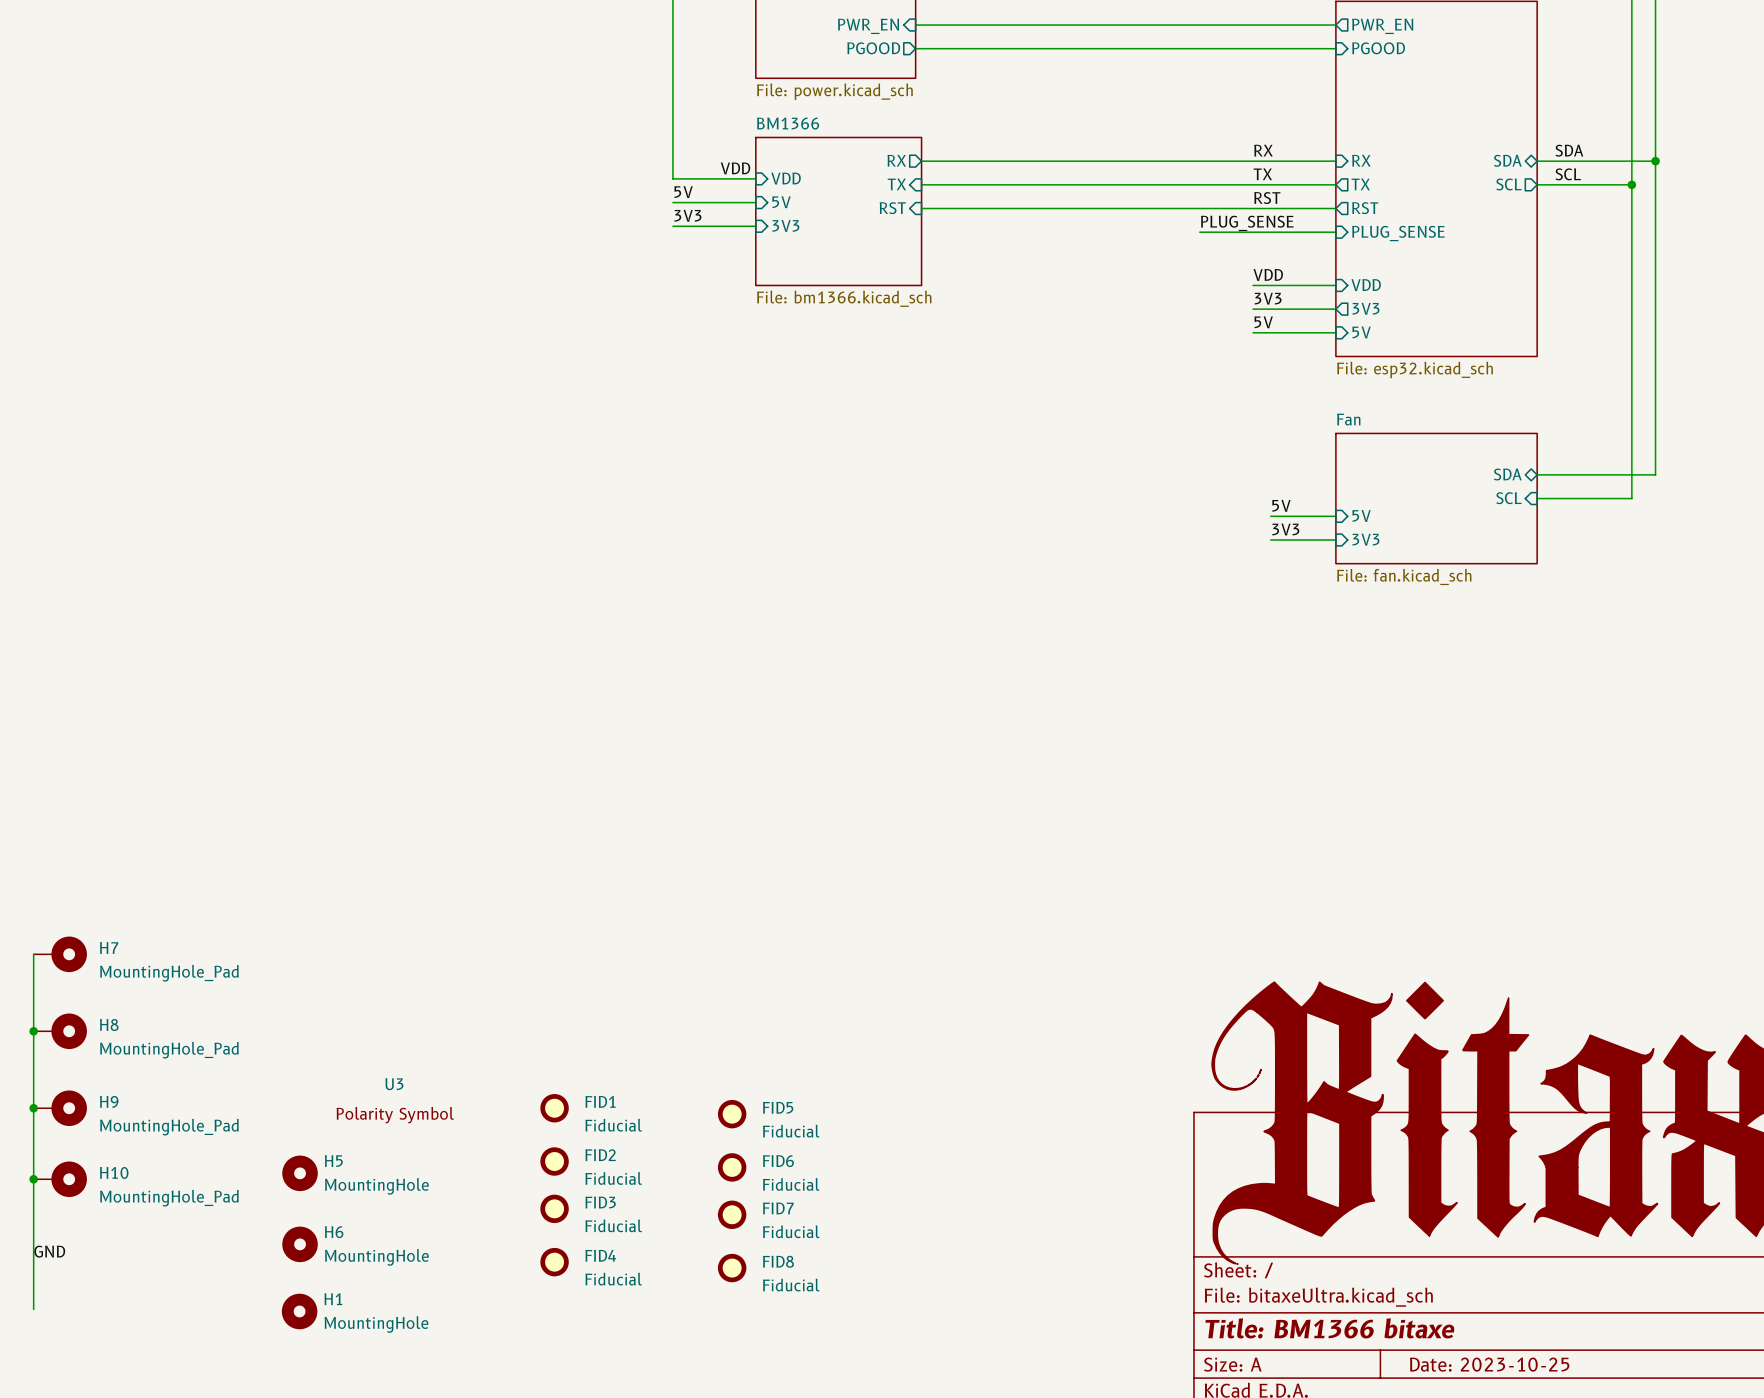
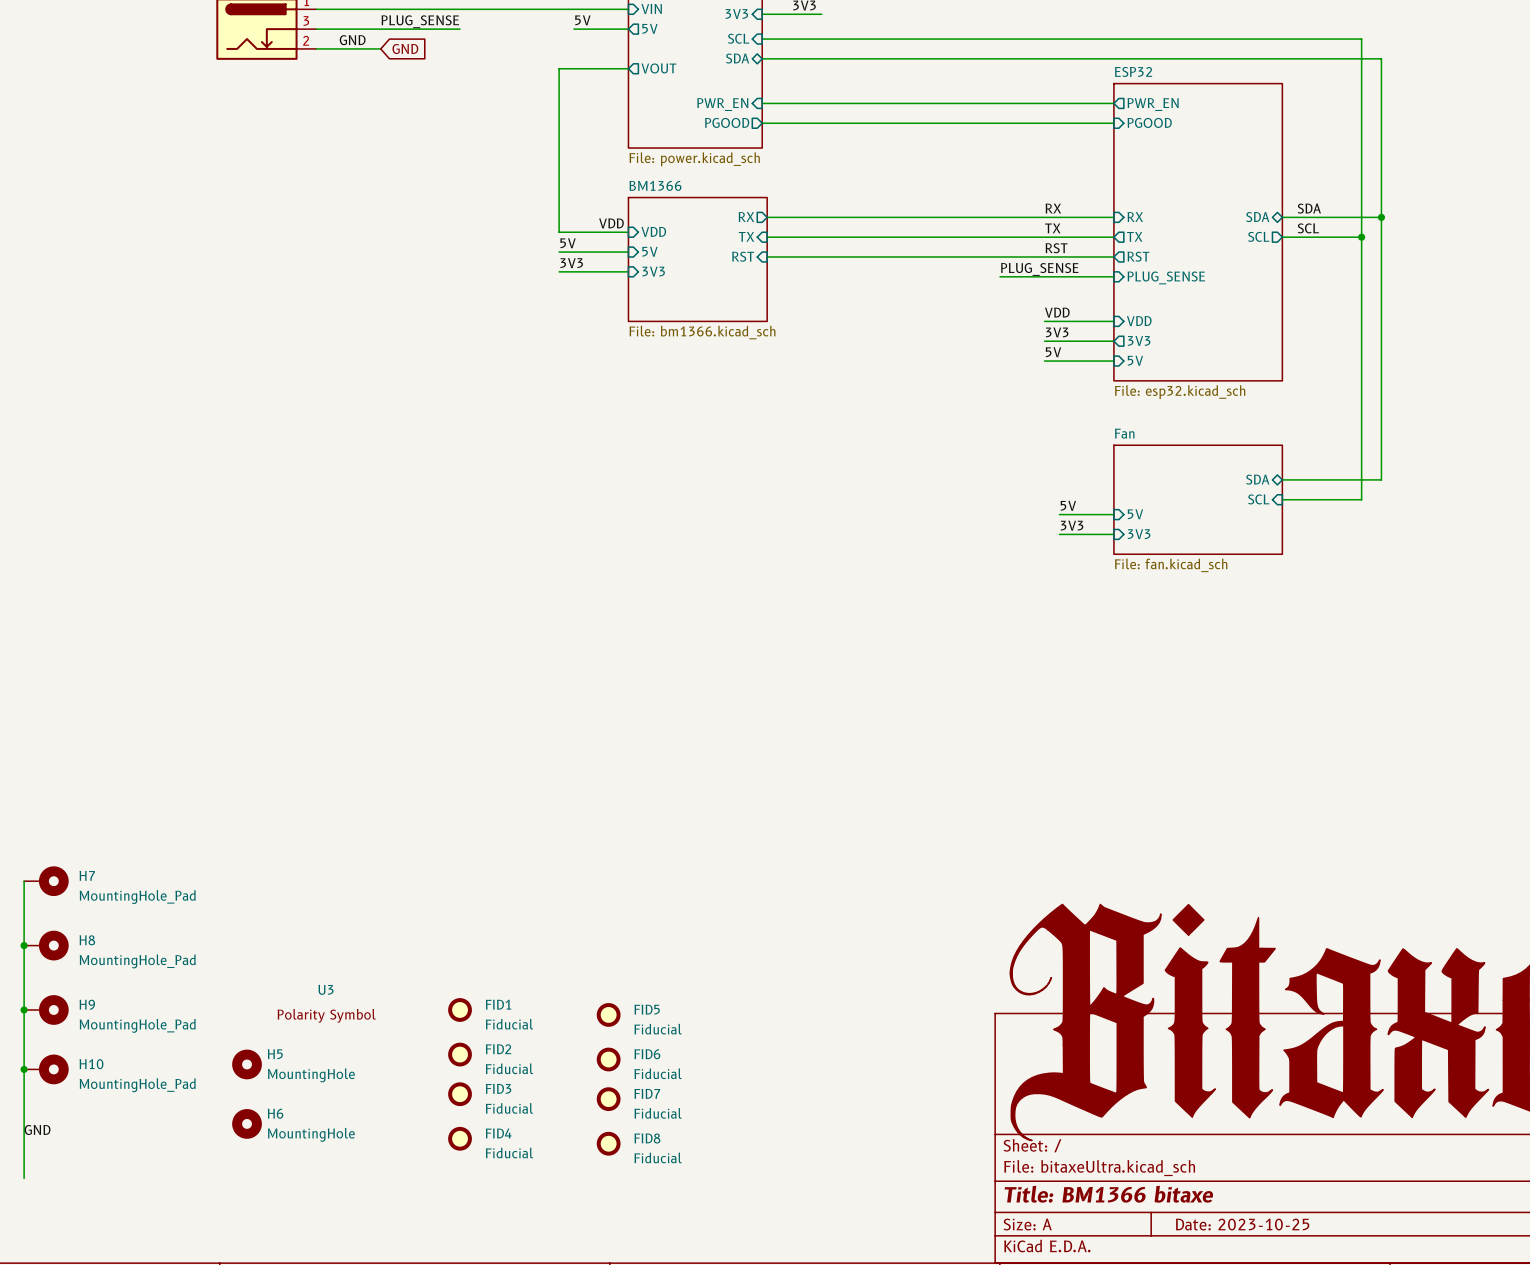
H1: MountingHole (299, 1311) -> none

